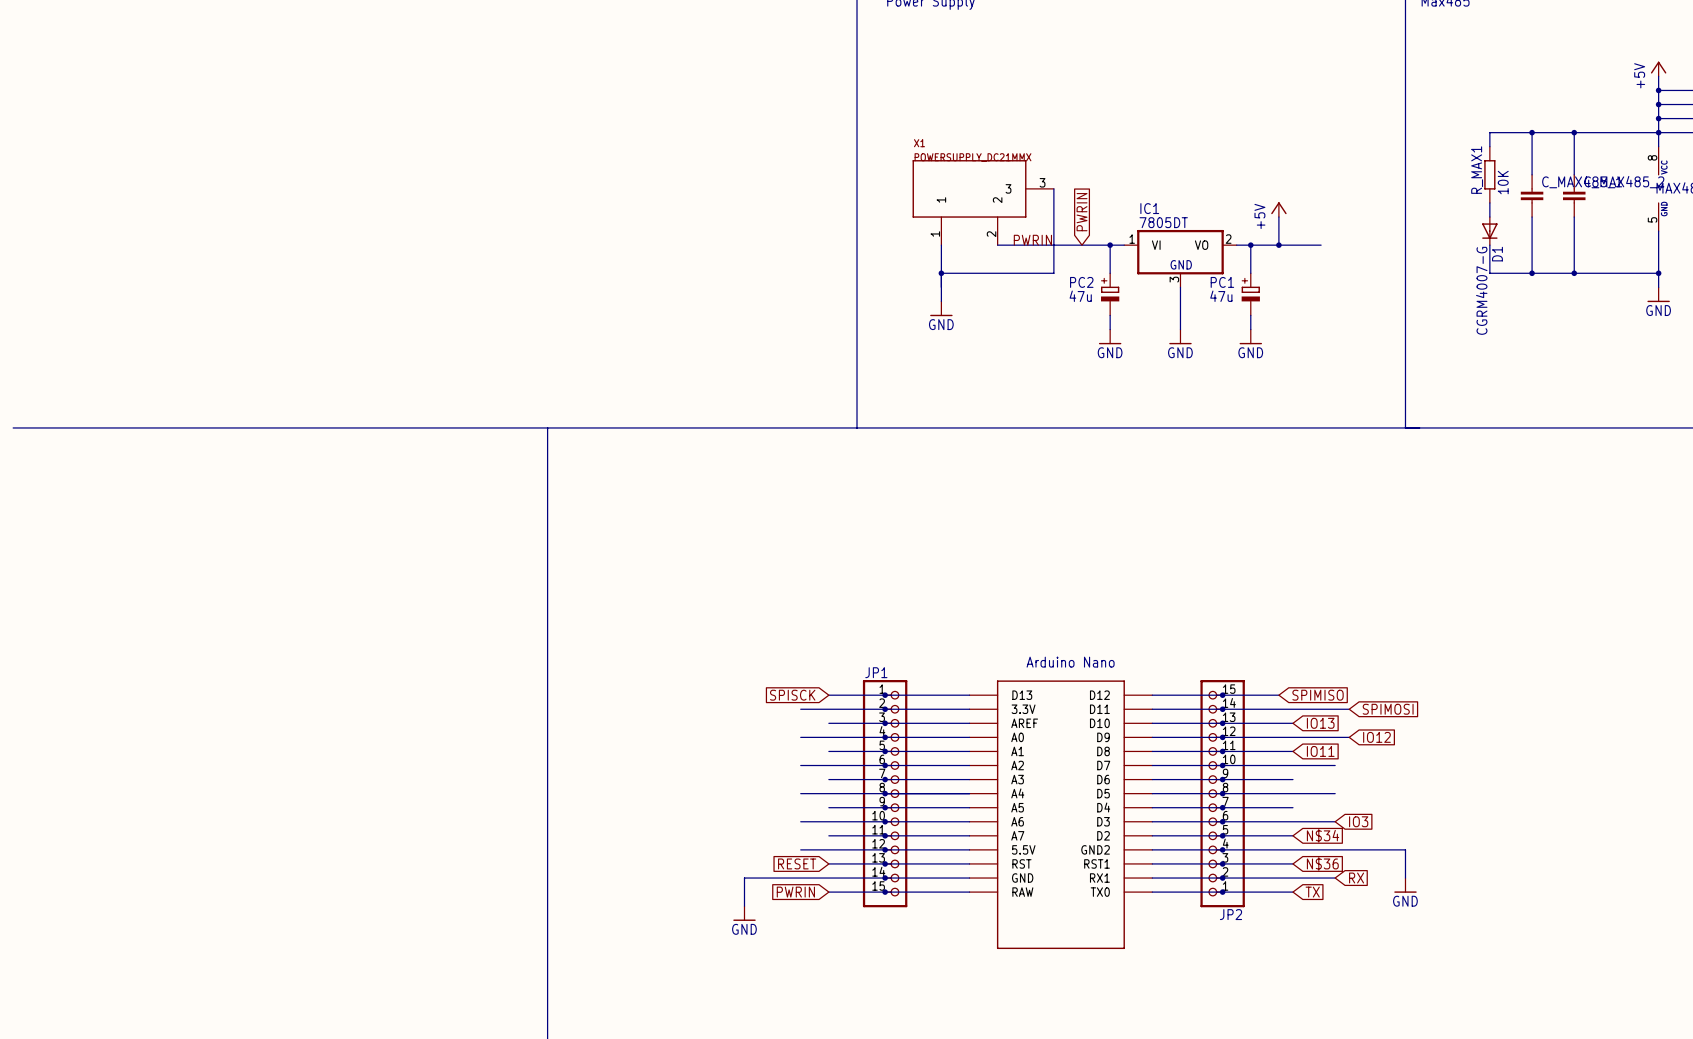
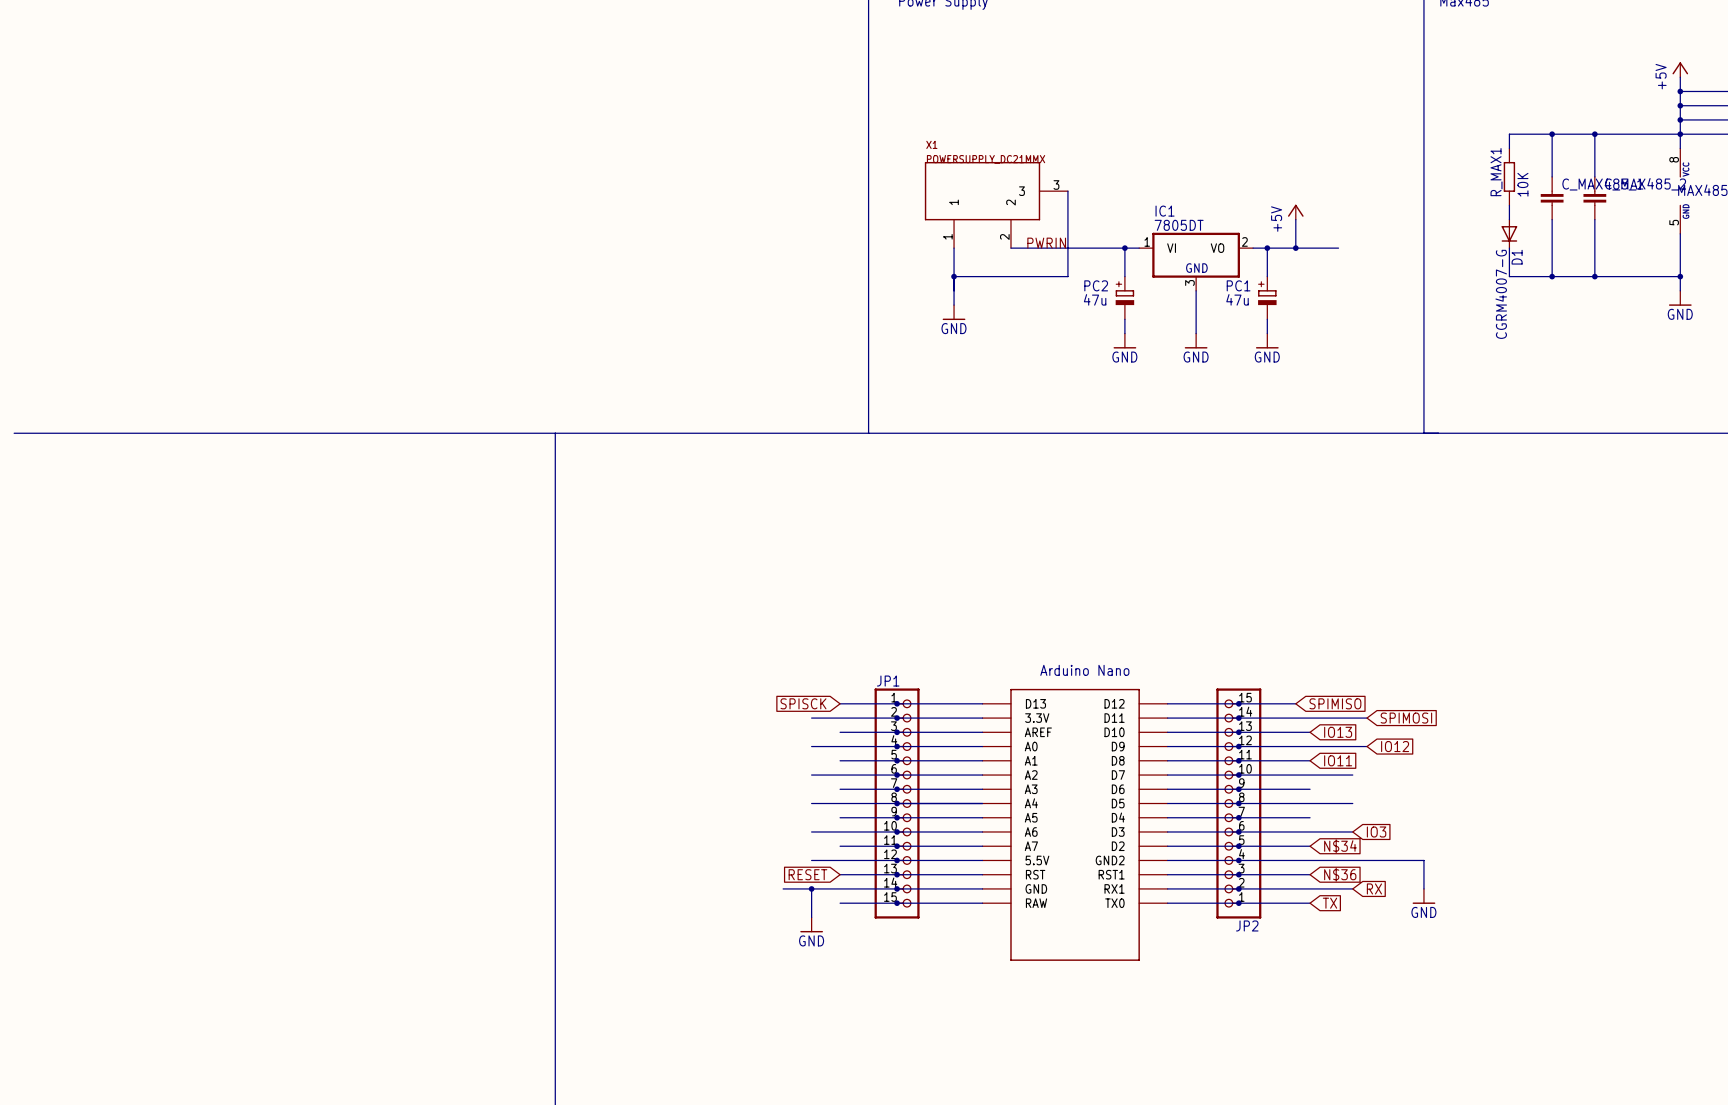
global label: PWRIN (1082, 212) -> none
wire: (772, 878) (744, 878) (744, 906) -> none
wire: none -> (811, 888) (811, 917)
junction: none -> (811, 888)
global label: PWRIN (795, 892) -> none
power symbol position: GND (744, 913) -> GND (811, 924)

